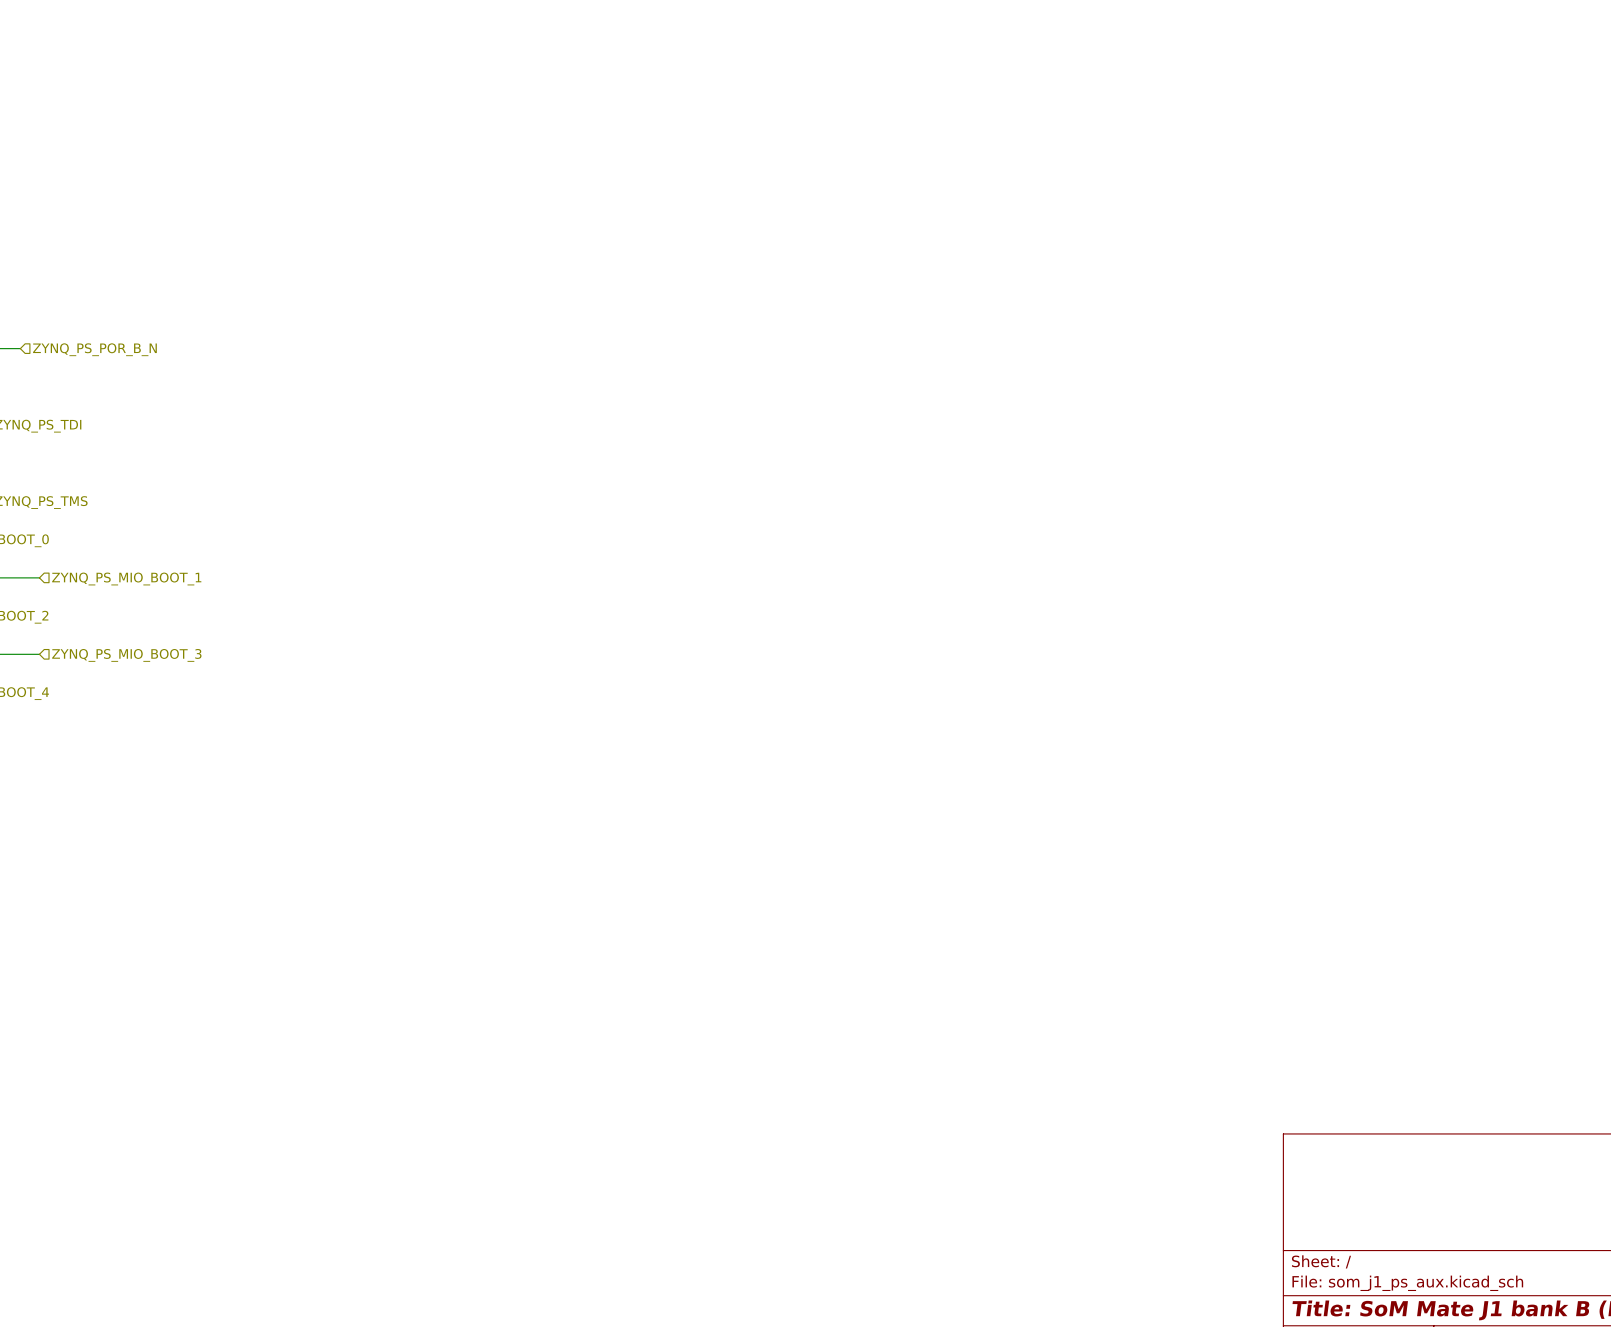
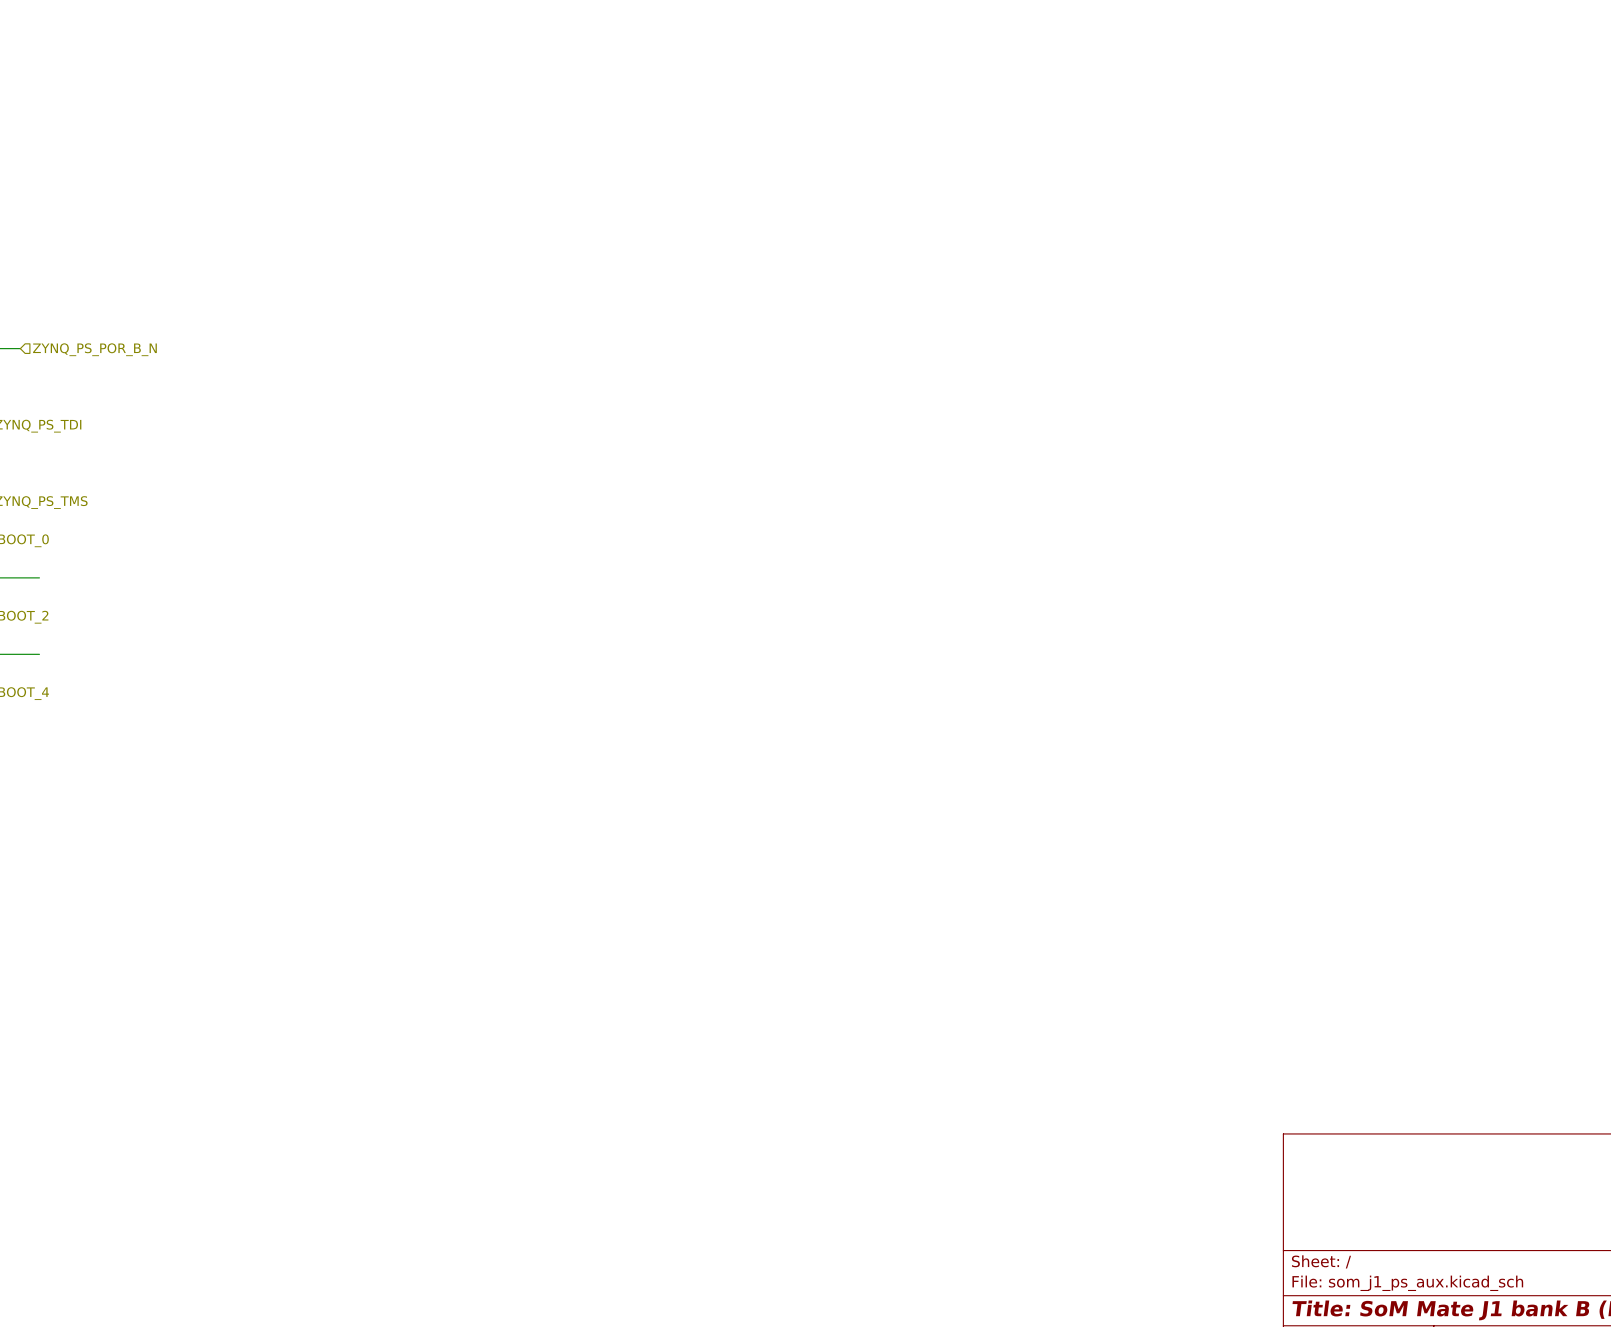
hierarchical label: ZYNQ_PS_MIO_BOOT_1 (126, 578) -> none
hierarchical label: ZYNQ_PS_MIO_BOOT_3 (126, 655) -> none

